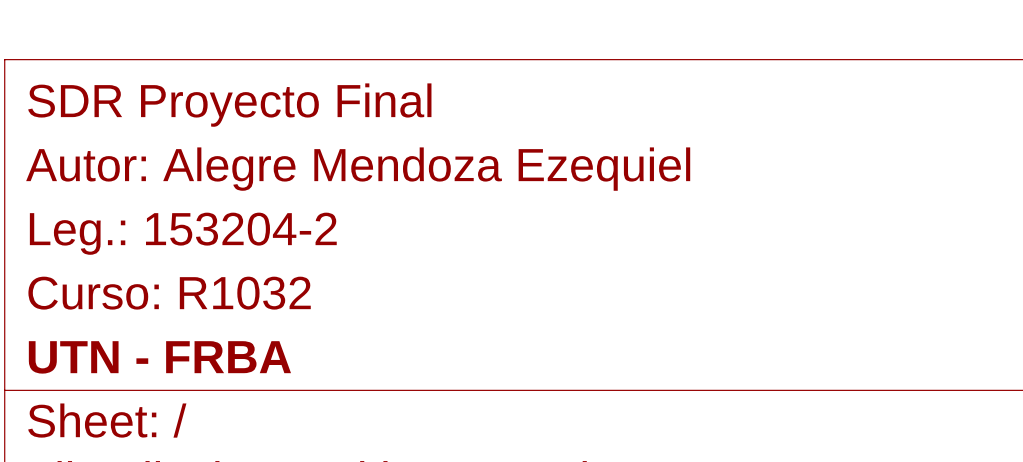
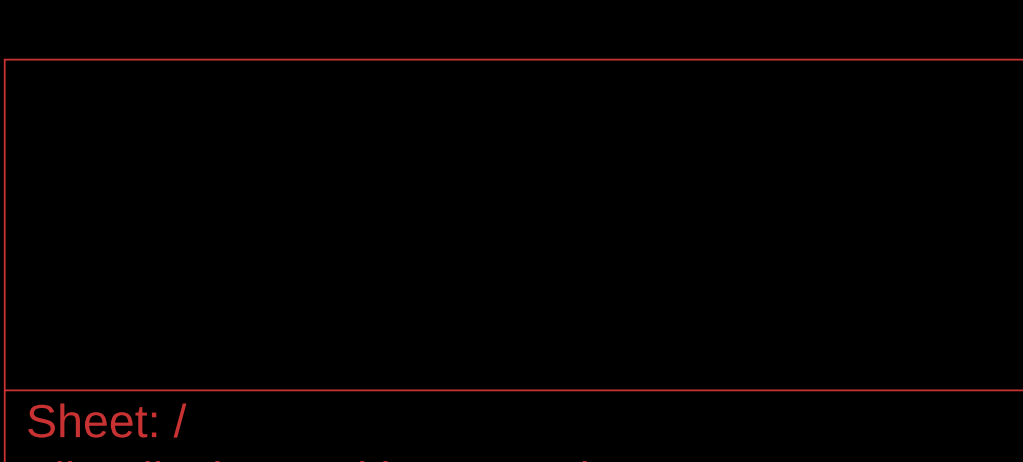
title block: SDR Proyecto Final (229, 105) -> none
title block: Autor: Alegre Mendoza Ezequiel (358, 169) -> none
title block: Leg.: 153204-2 (183, 233) -> none
title block: Curso: R1032 (169, 293) -> none
title block: UTN - FRBA (159, 357) -> none

